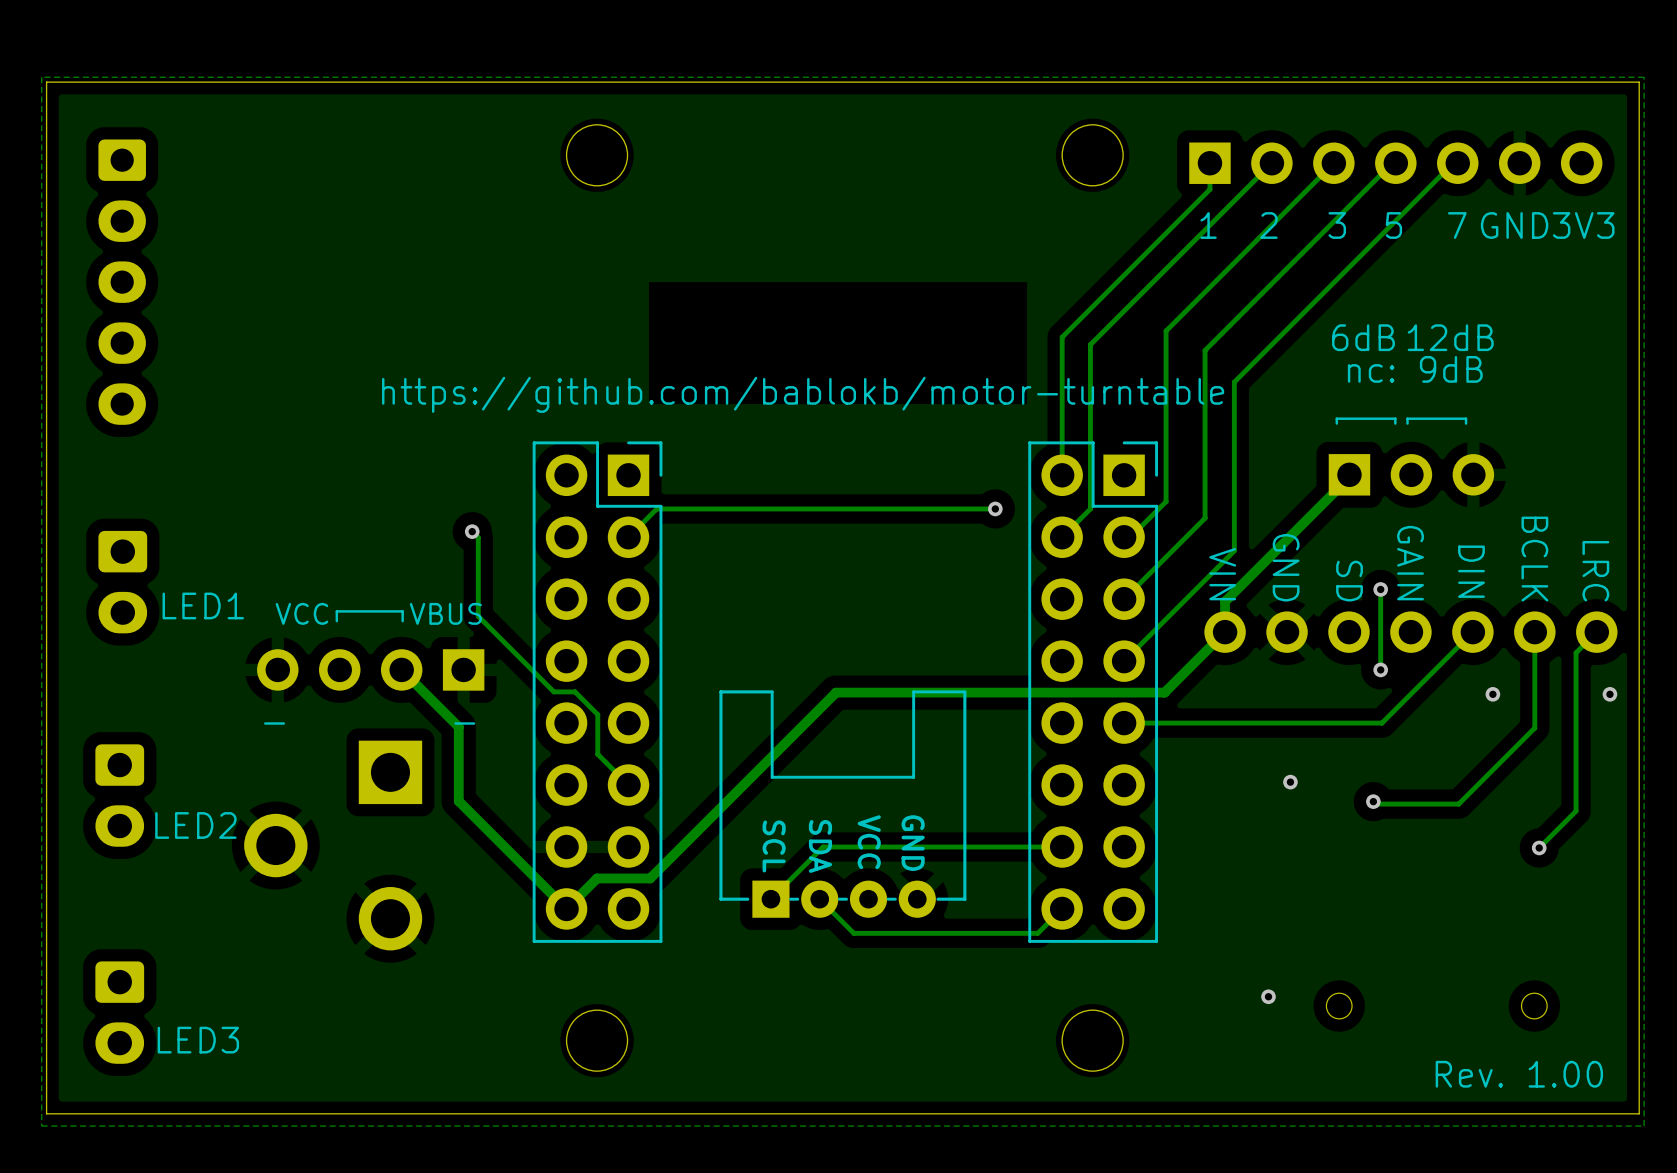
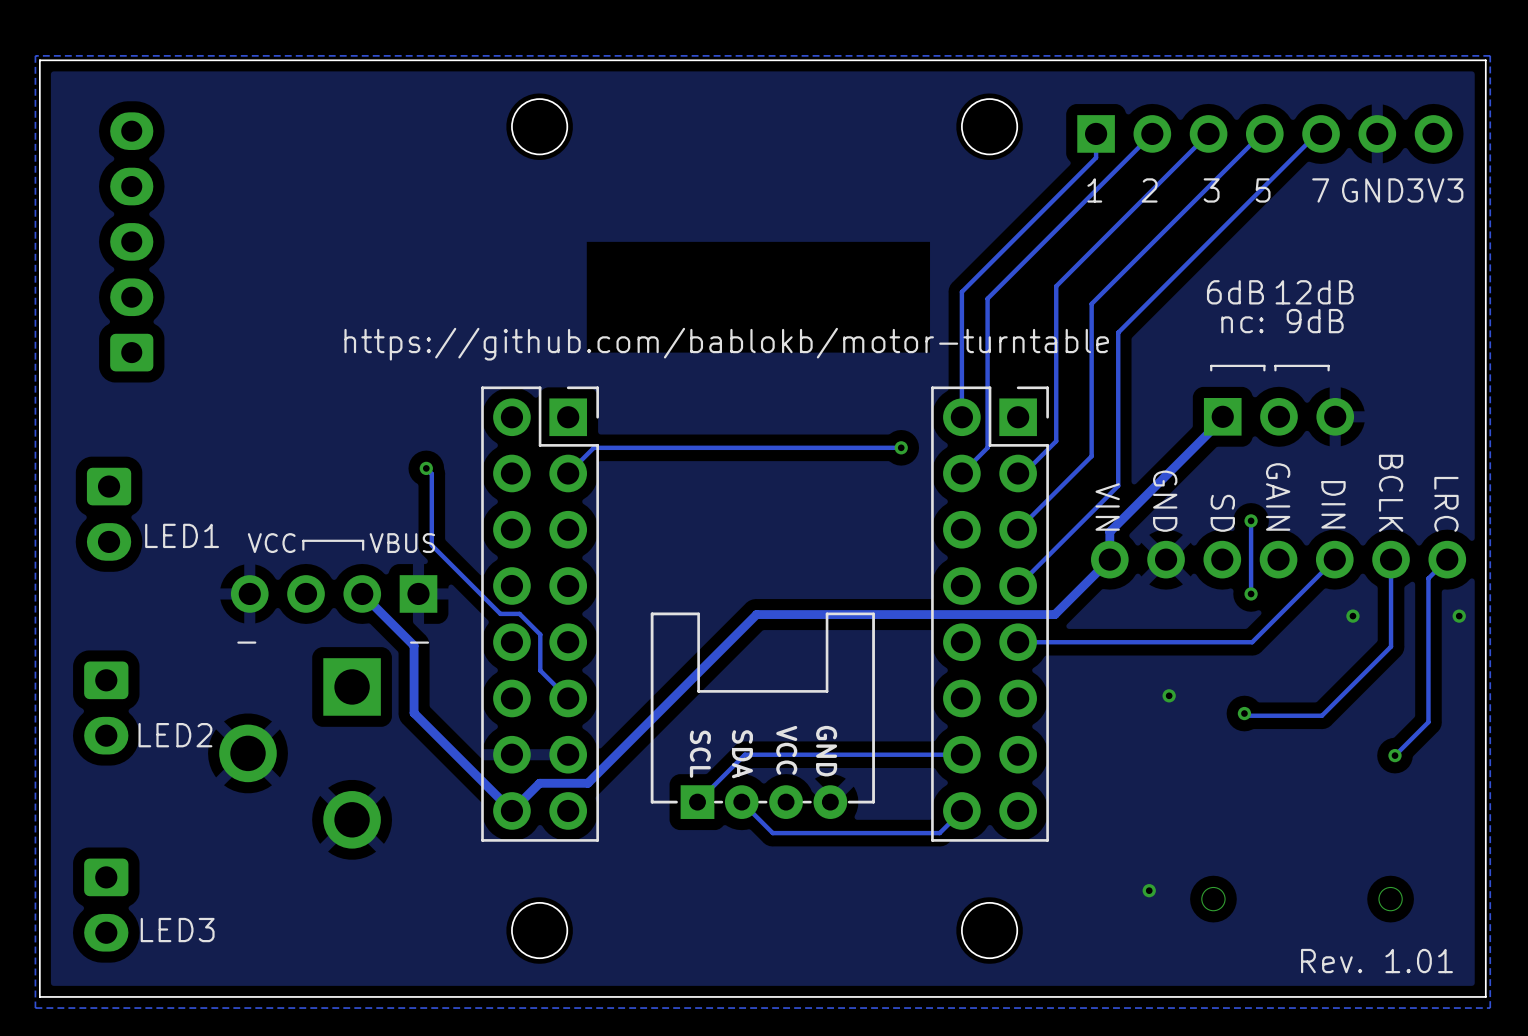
part rotation: 0° (122, 282) -> 180° (131, 241)
text: Rev. 1.00 (1519, 1074) -> Rev. 1.01 (1376, 961)

